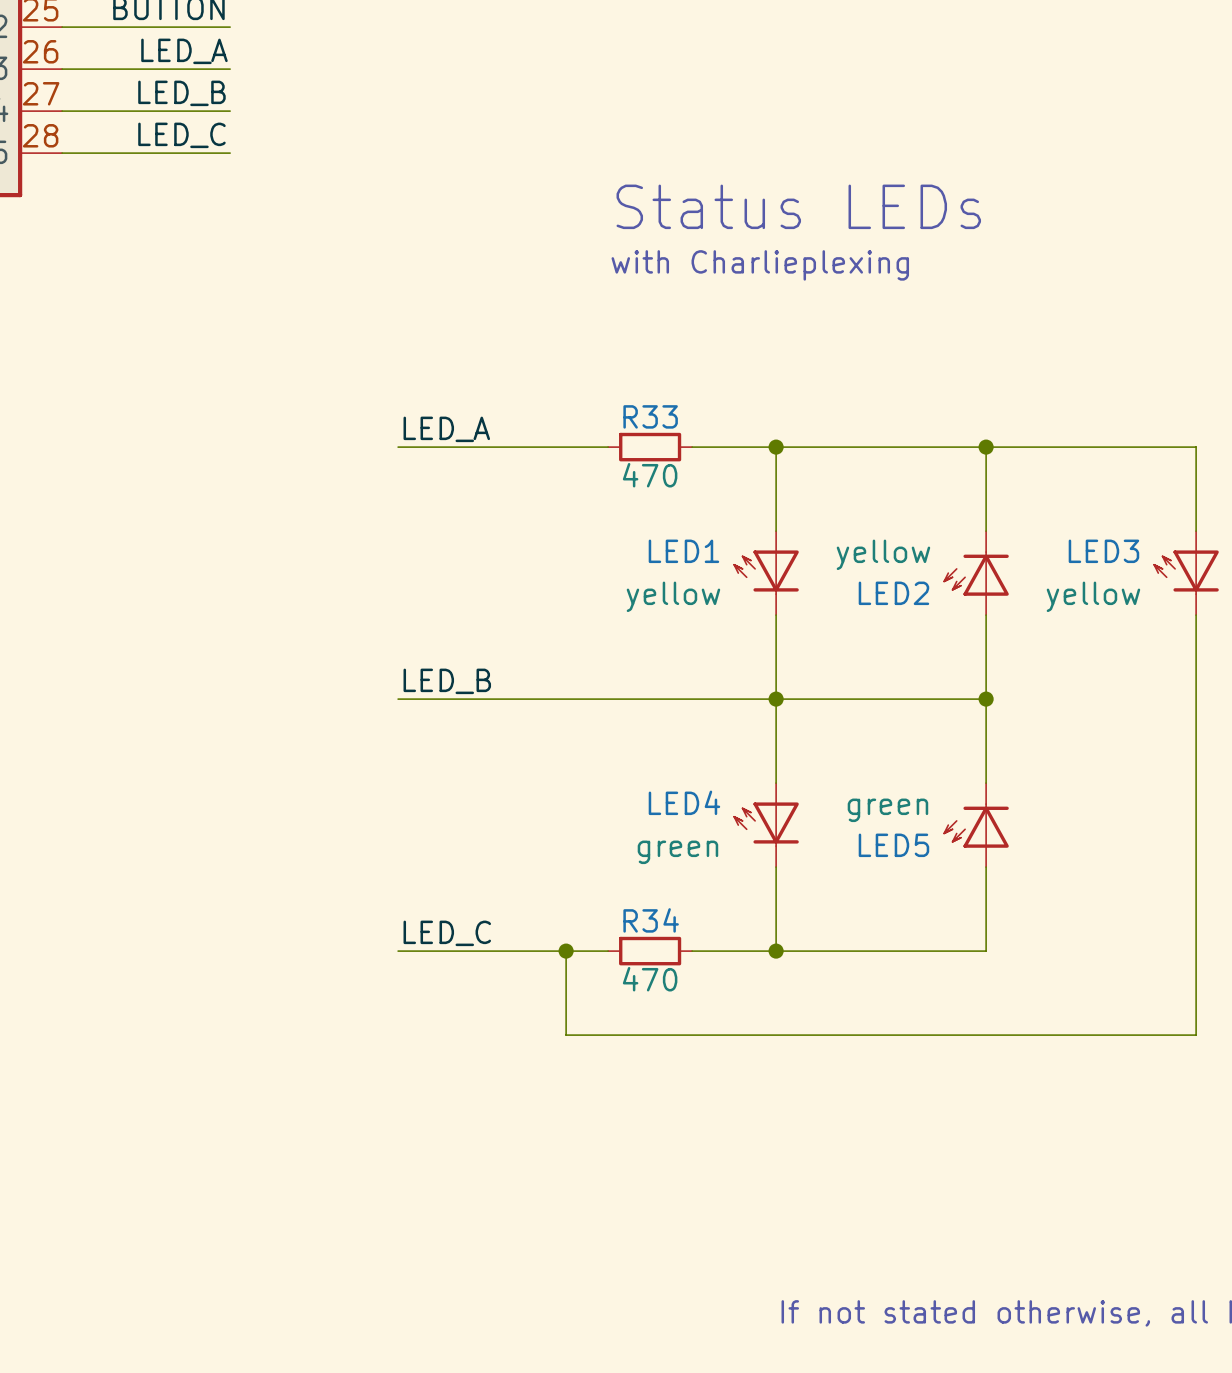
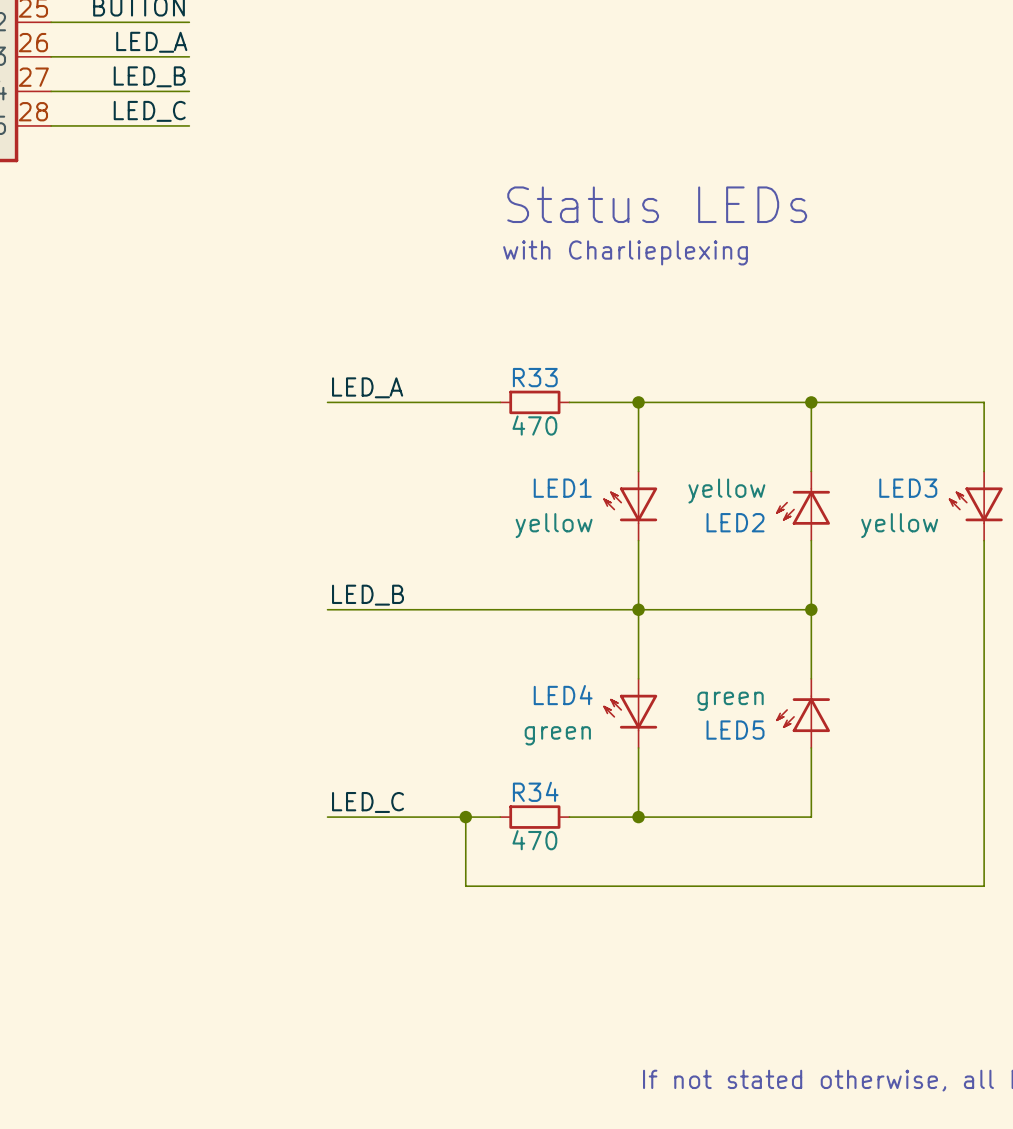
text: Status LEDs (798, 206) -> none
text: with Charlieplexing (760, 265) -> Status LEDs (657, 204)
text: none -> with Charlieplexing (625, 252)
label position: LED_A (446, 429) -> LED_A (367, 387)
wire: (398, 447) (608, 447) -> (327, 402) (500, 402)
R33 position: (650, 447) -> (534, 402)
wire: (692, 447) (1196, 447) (1196, 489) -> (569, 402) (984, 402)
wire: (776, 447) (776, 489) -> none
junction position: (776, 447) -> (638, 402)
wire: (986, 447) (986, 489) -> none
junction position: (986, 447) -> (811, 402)
LED1 position: (766, 573) -> (630, 506)
LED2 position: (976, 573) -> (803, 506)
LED3 position: (1186, 573) -> (976, 506)
label position: LED_B (447, 681) -> LED_B (368, 595)
wire: (398, 699) (986, 699) -> (327, 609) (811, 609)
junction position: (776, 699) -> (638, 609)
junction position: (986, 699) -> (811, 609)
LED4 position: (766, 825) -> (630, 713)
LED5 position: (976, 825) -> (803, 713)
label position: LED_C (447, 933) -> LED_C (368, 802)
wire: (398, 951) (608, 951) -> (327, 817) (500, 817)
wire: (566, 951) (566, 993) -> (638, 782) (638, 817)
junction position: (566, 951) -> (465, 817)
R34 position: (650, 951) -> (534, 817)
wire: (692, 951) (986, 951) -> (569, 817) (811, 817) (811, 782)
junction position: (776, 951) -> (638, 817)
wire: (566, 1035) (1196, 1035) -> (465, 851) (465, 886) (984, 886) (984, 851)

